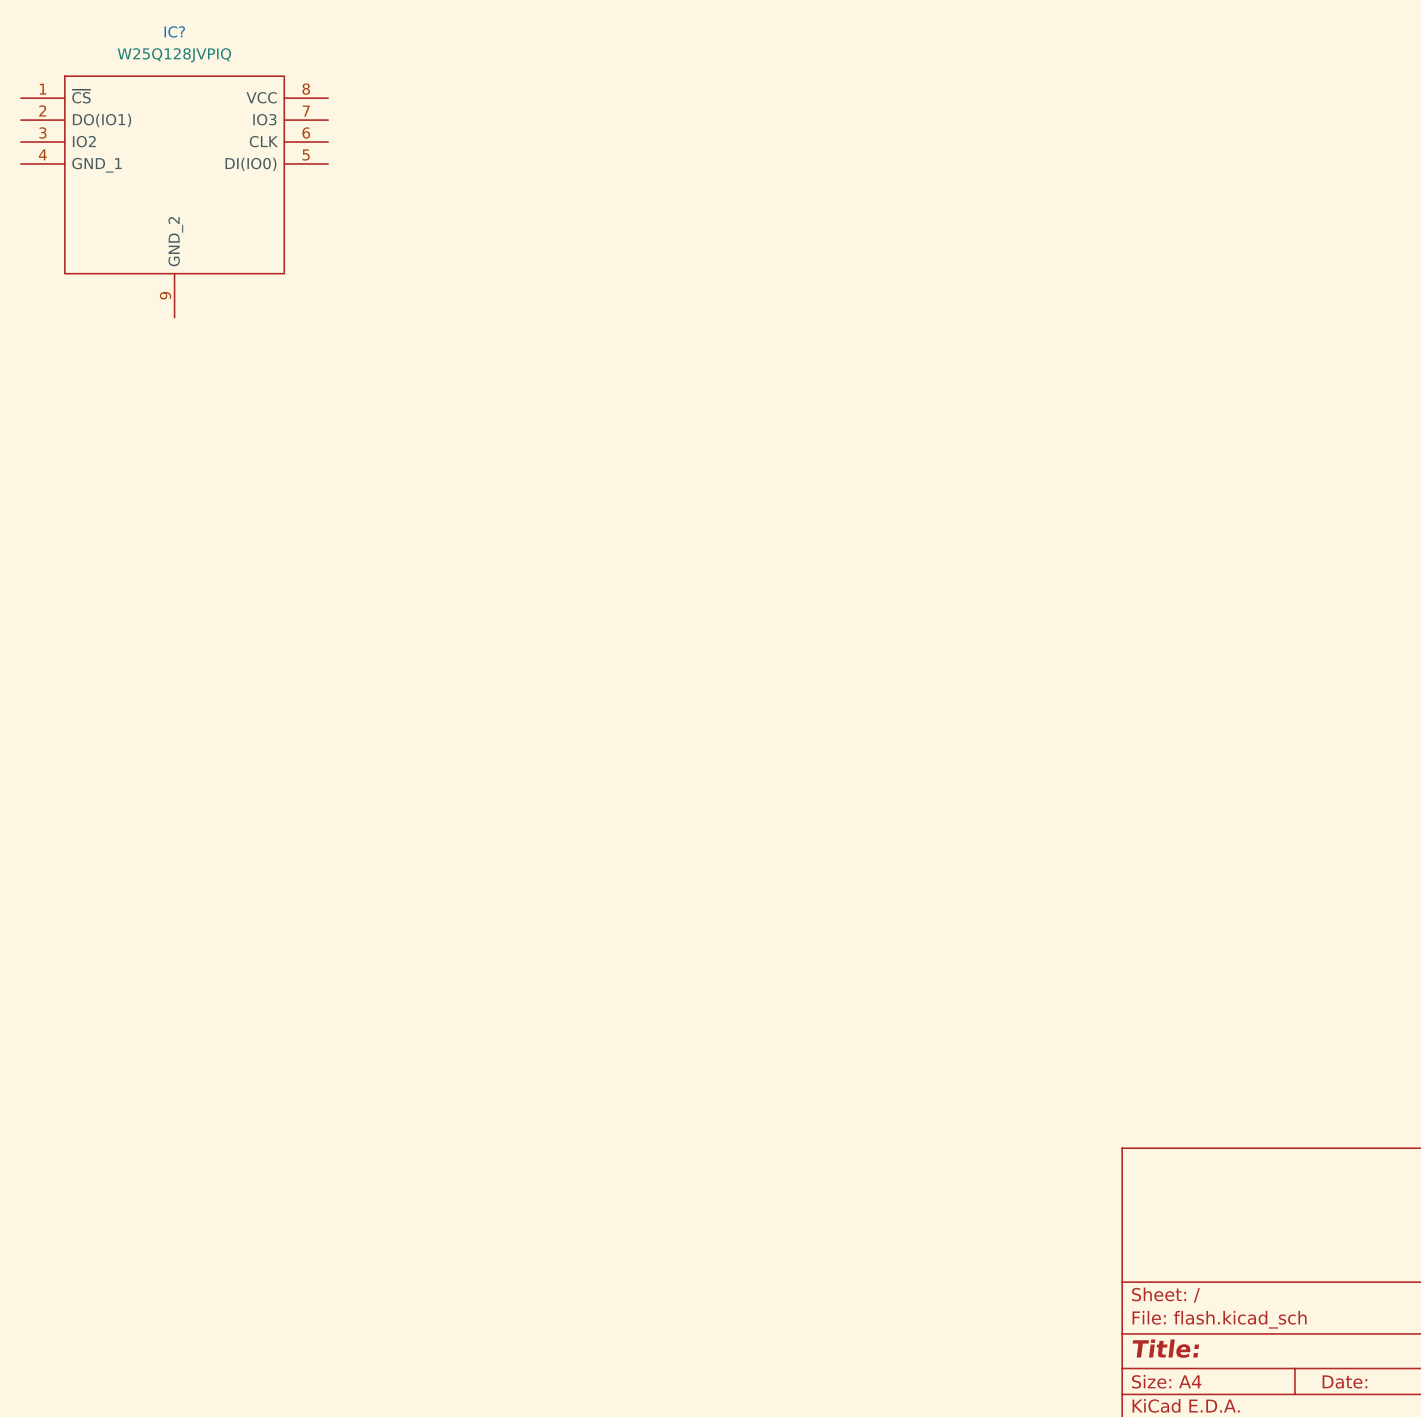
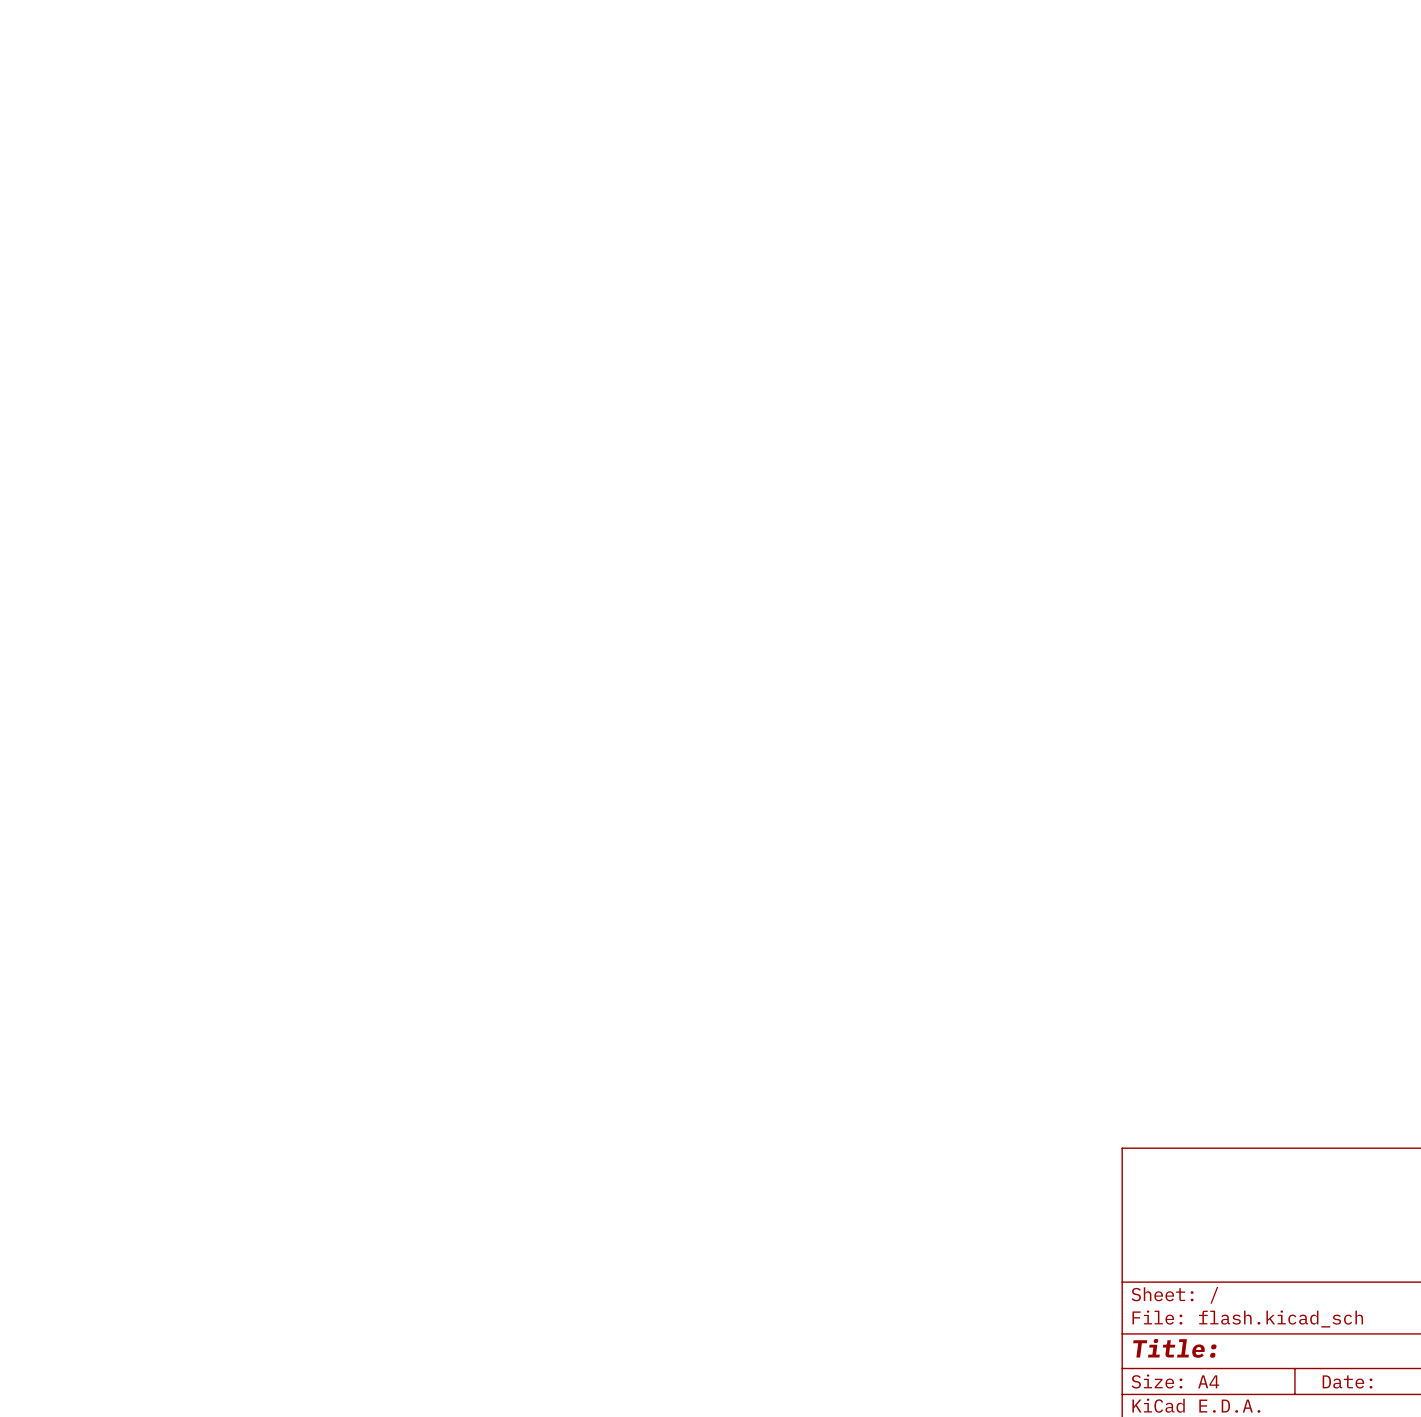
IC?: W25Q128JVPIQ (174, 196) -> none

